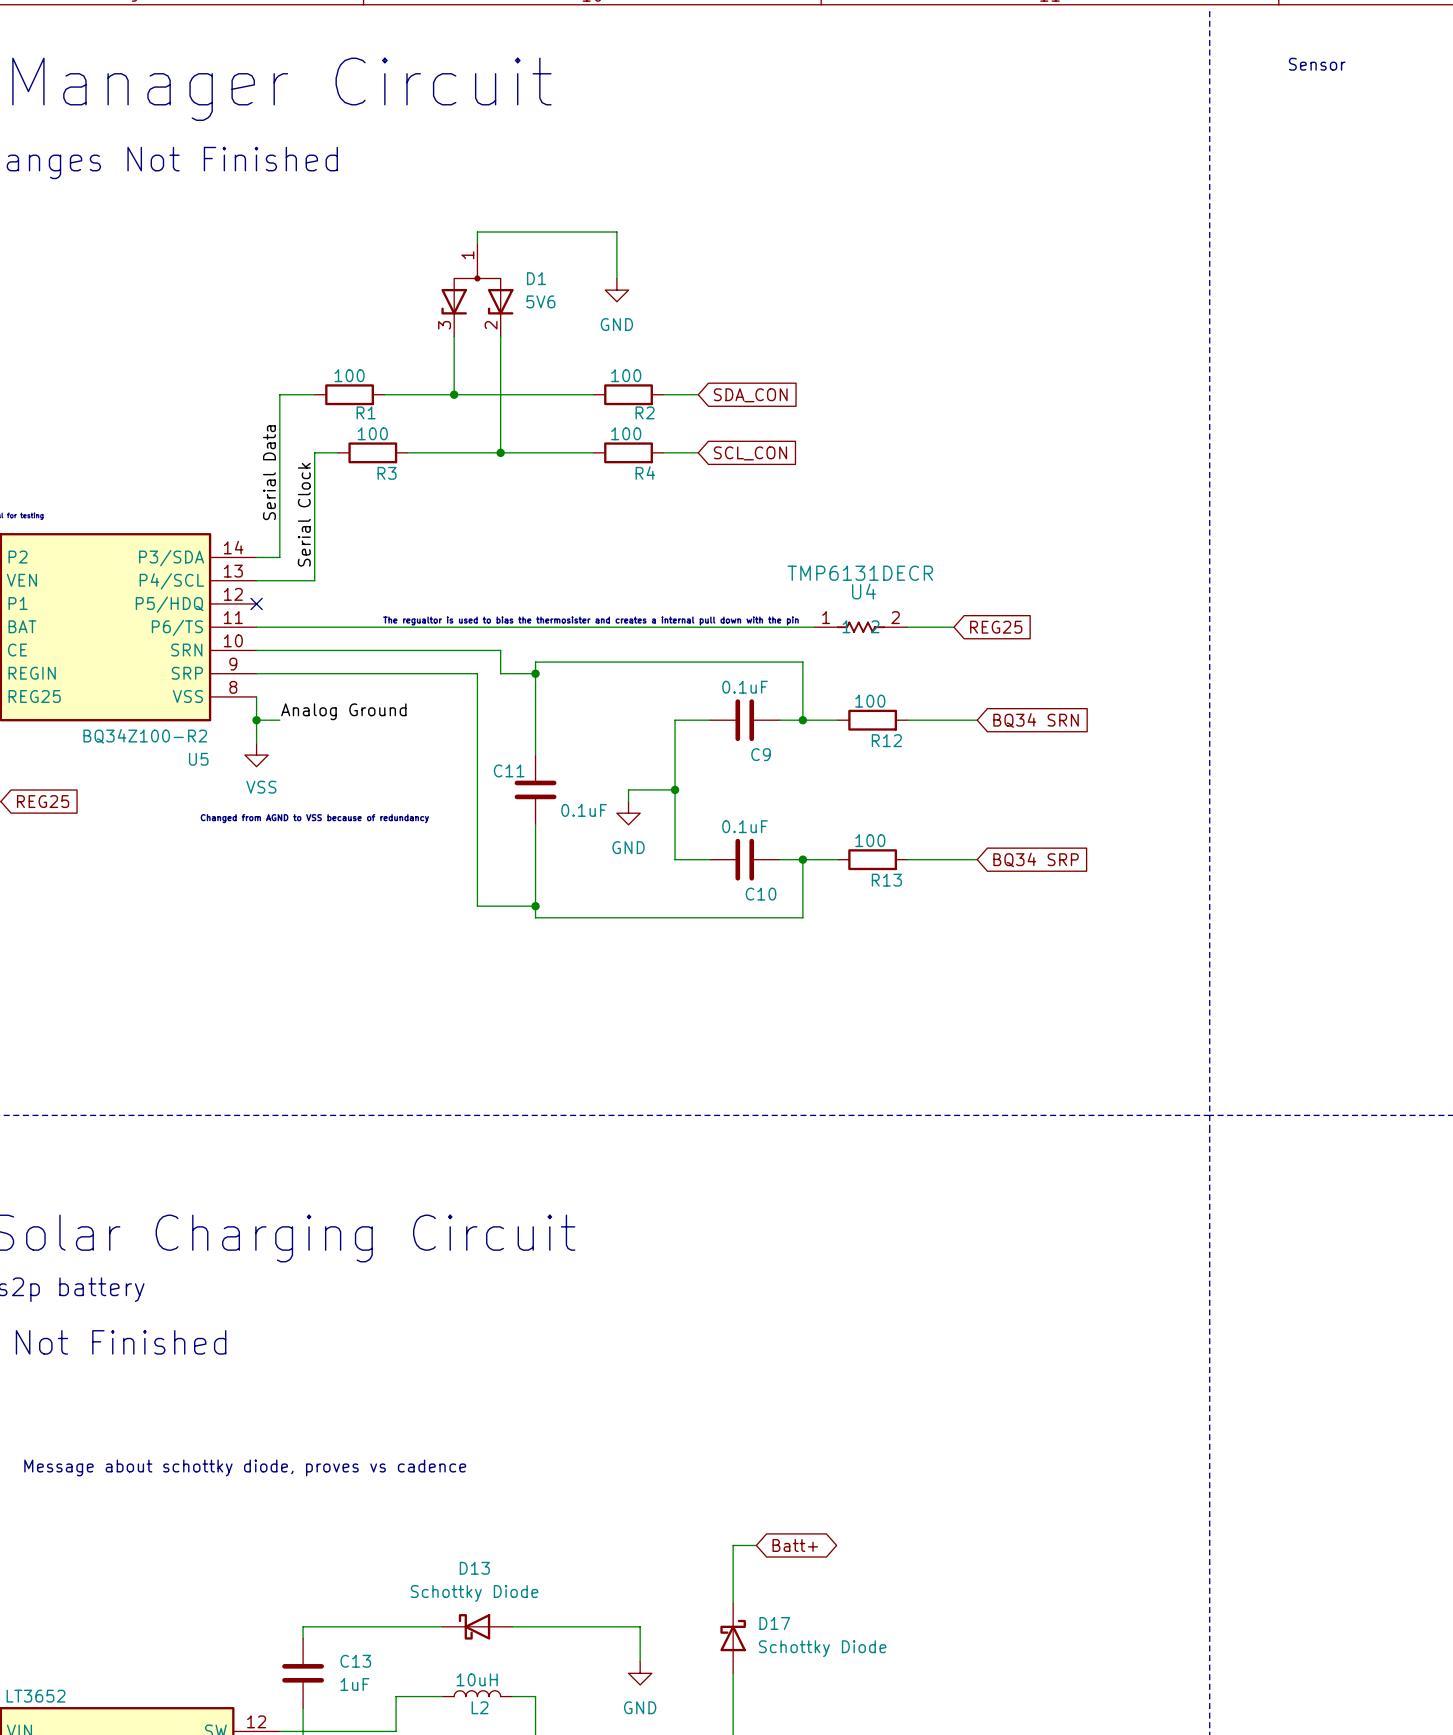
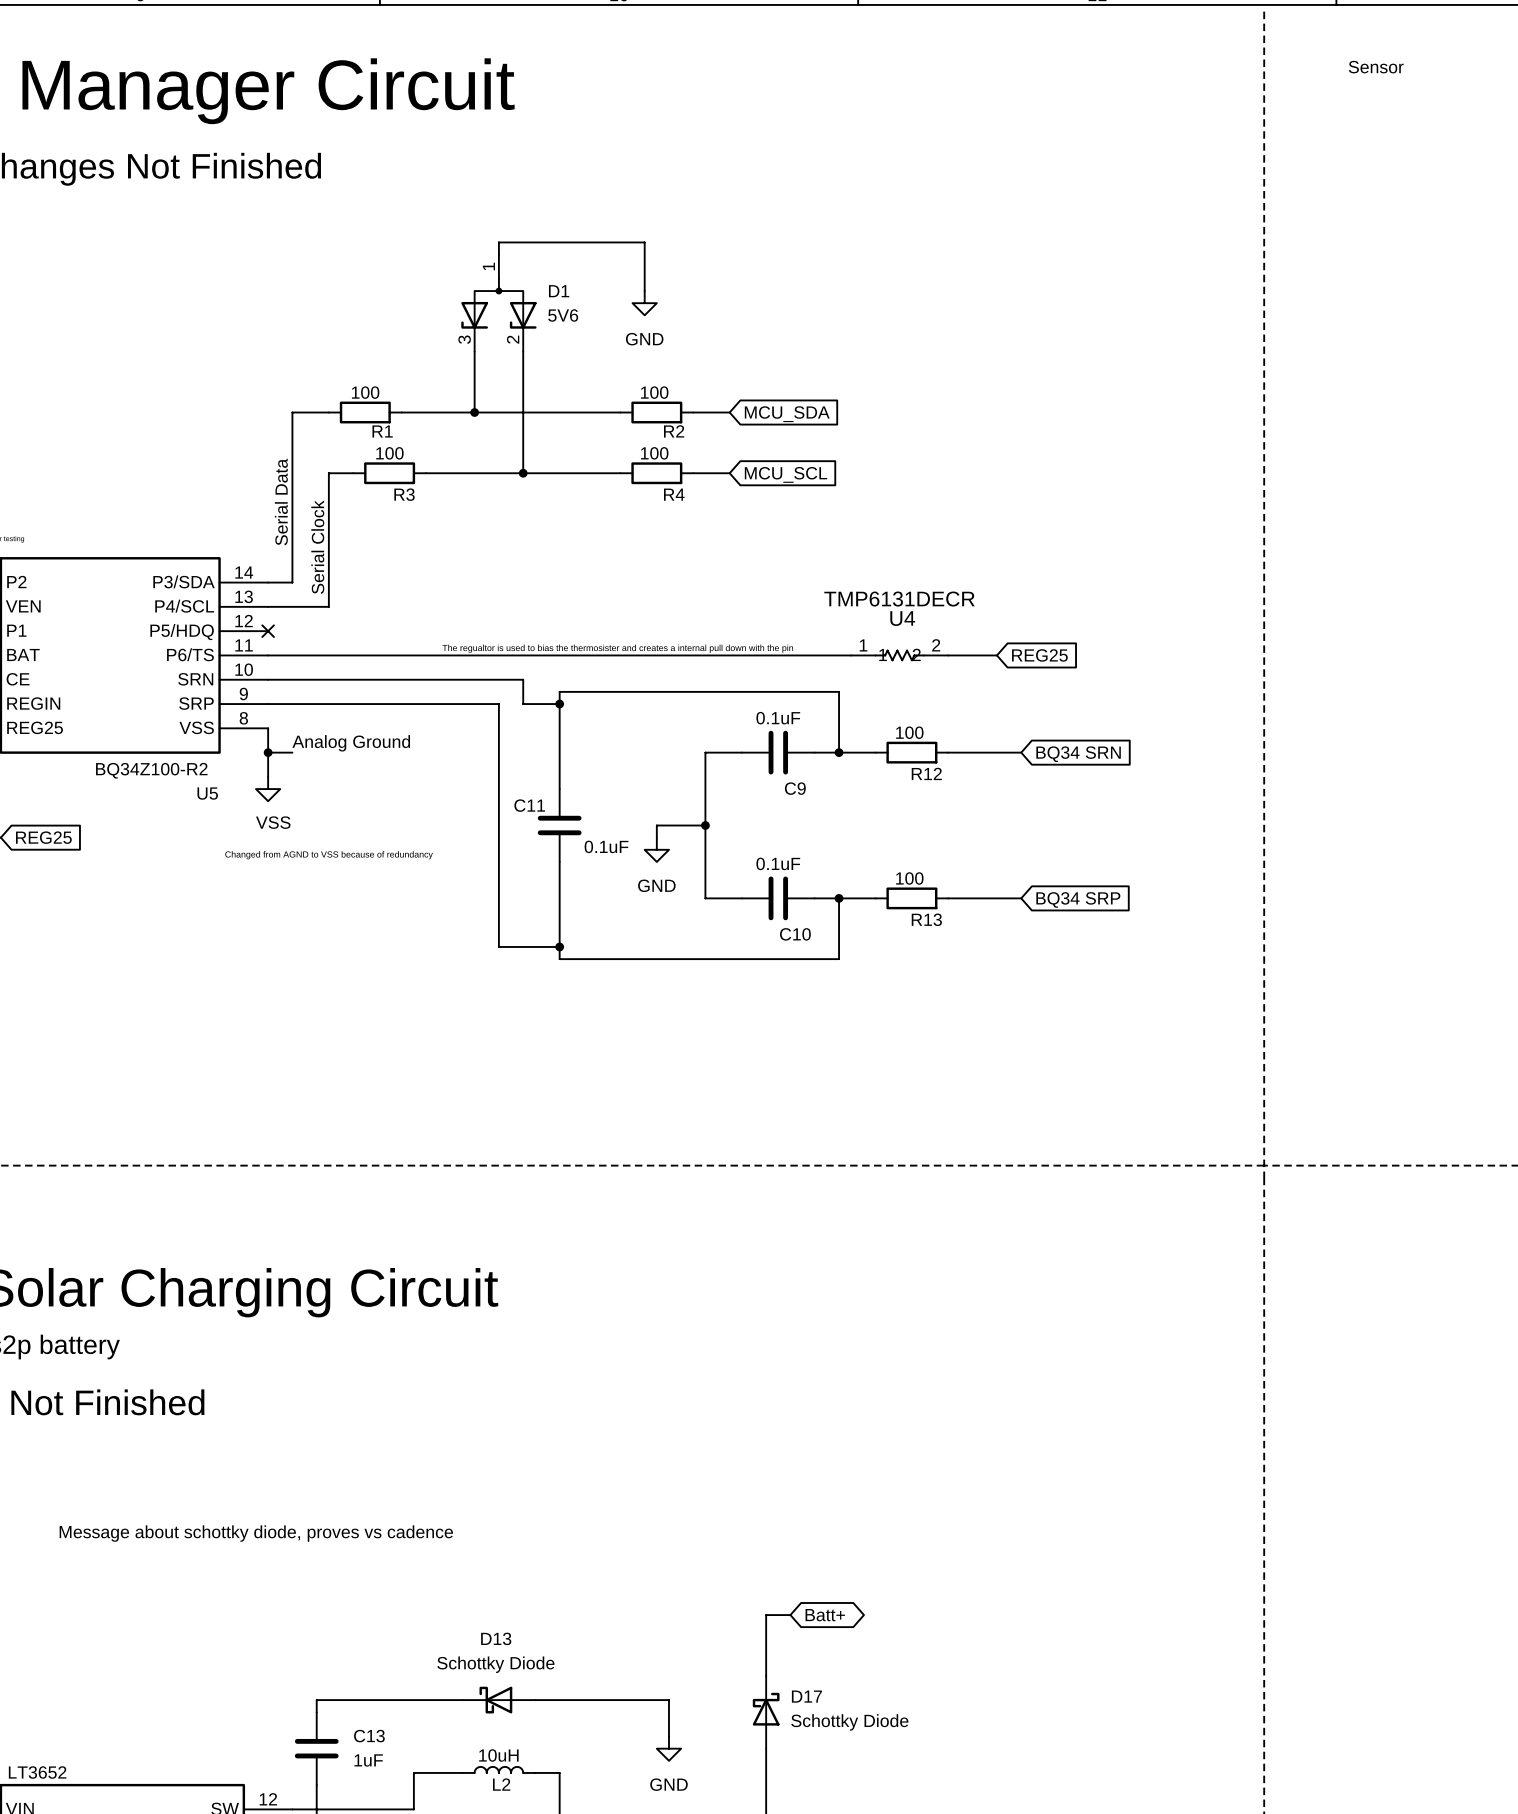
global label: SDA_CON (750, 395) -> MCU_SDA (787, 414)
global label: SCL_CON (750, 453) -> MCU_SCL (786, 474)

